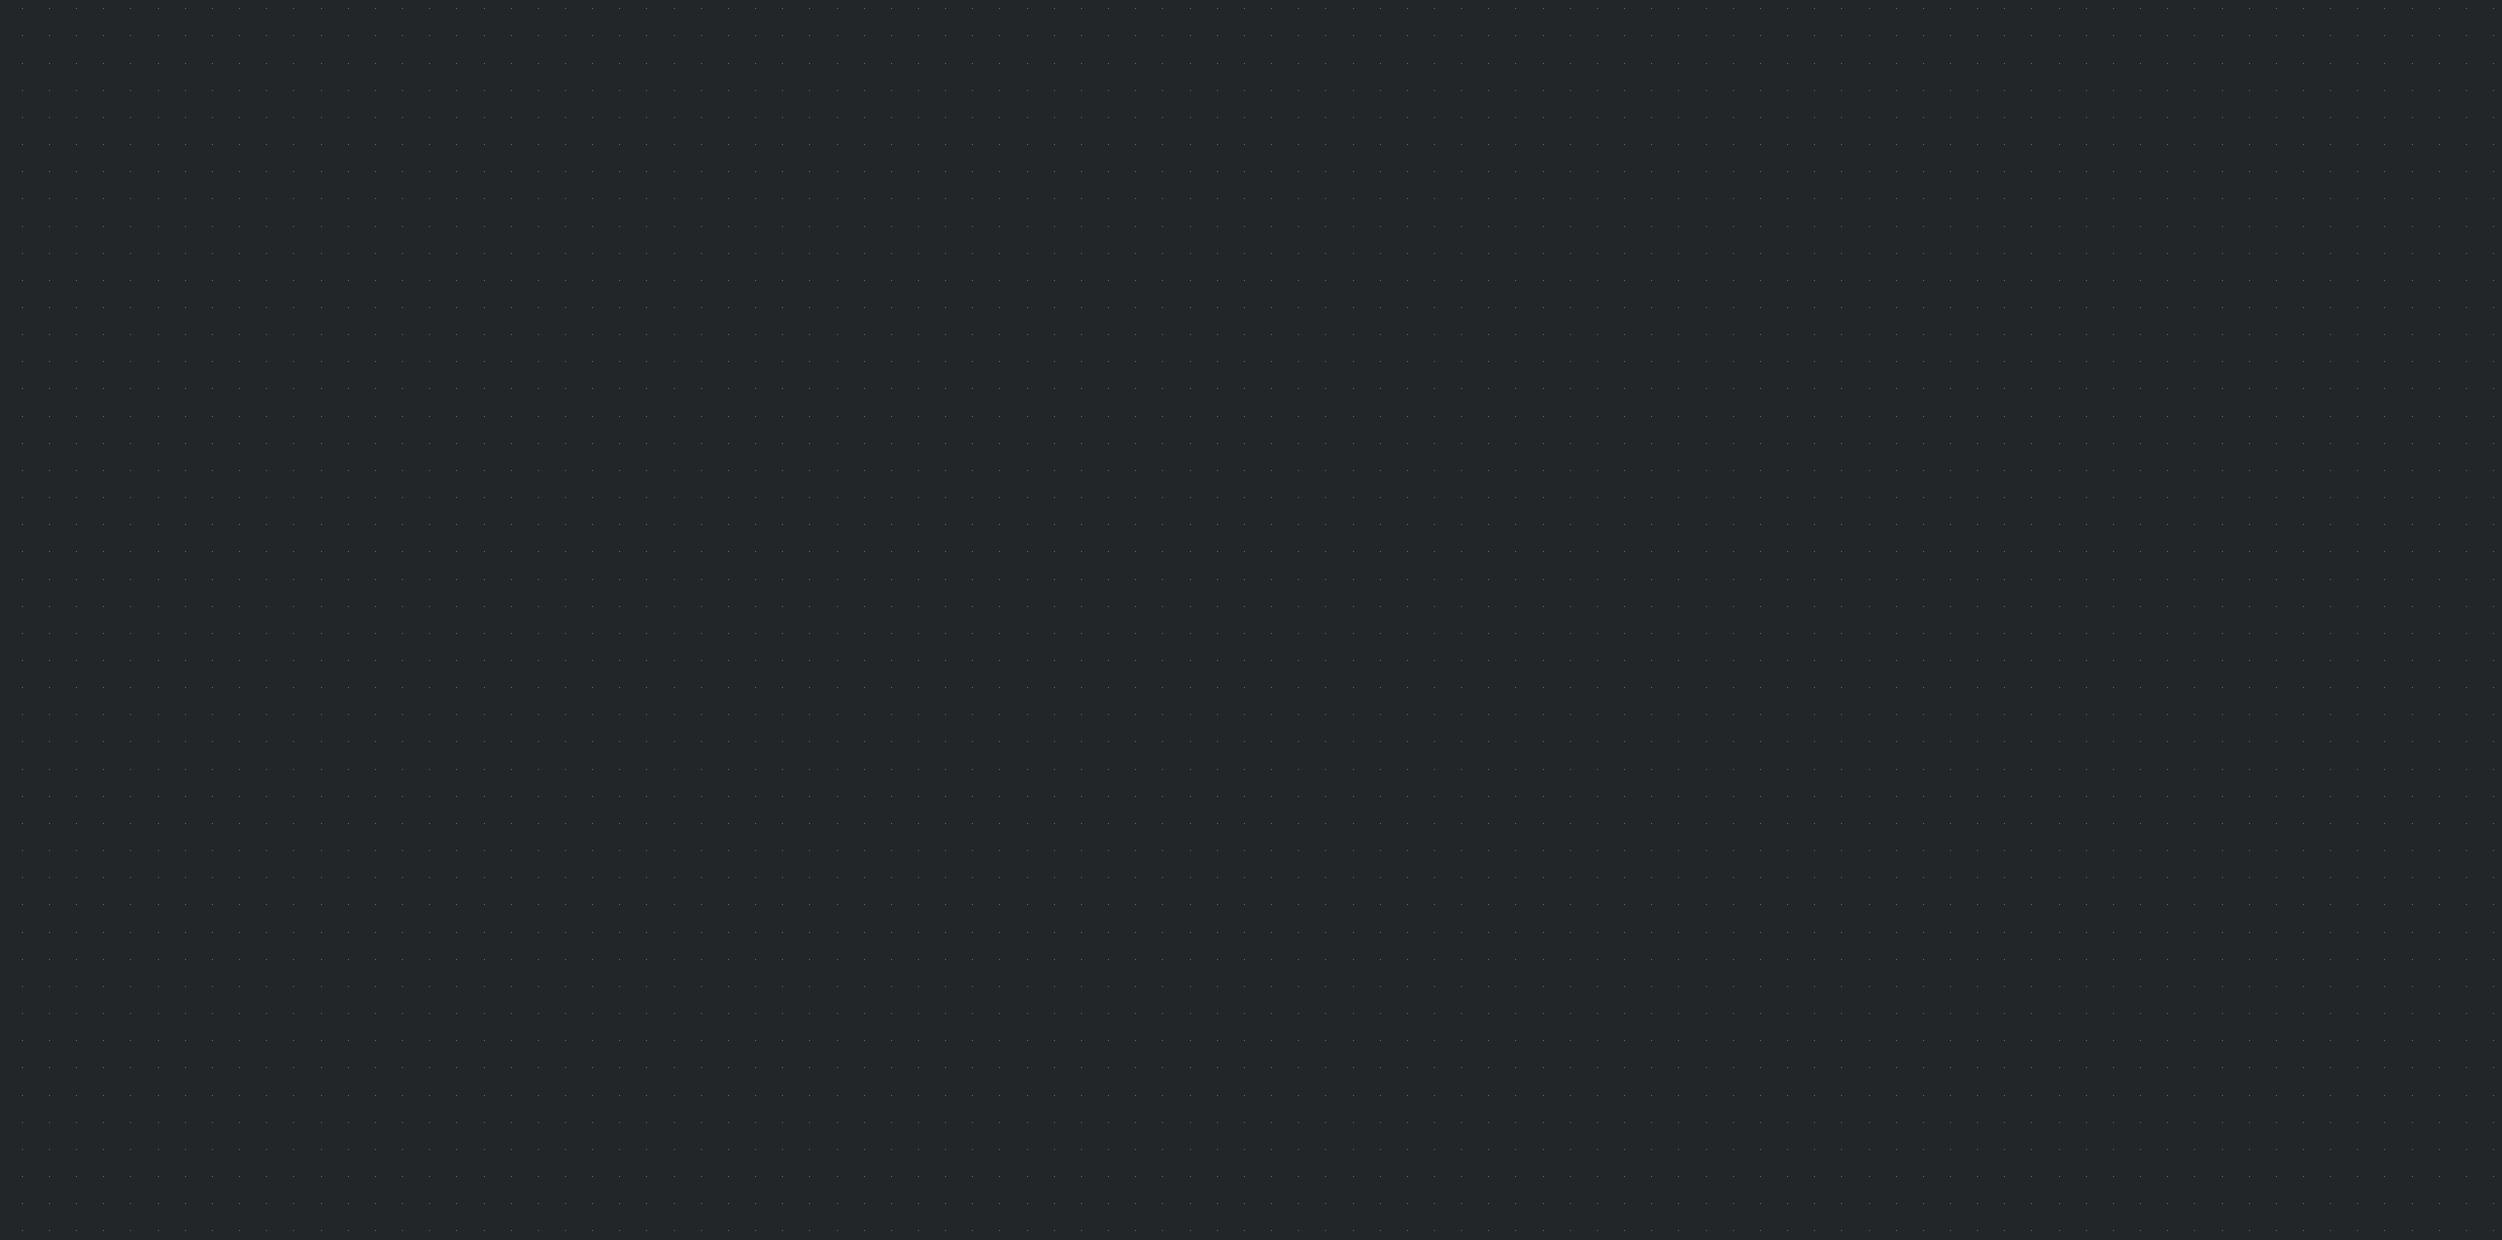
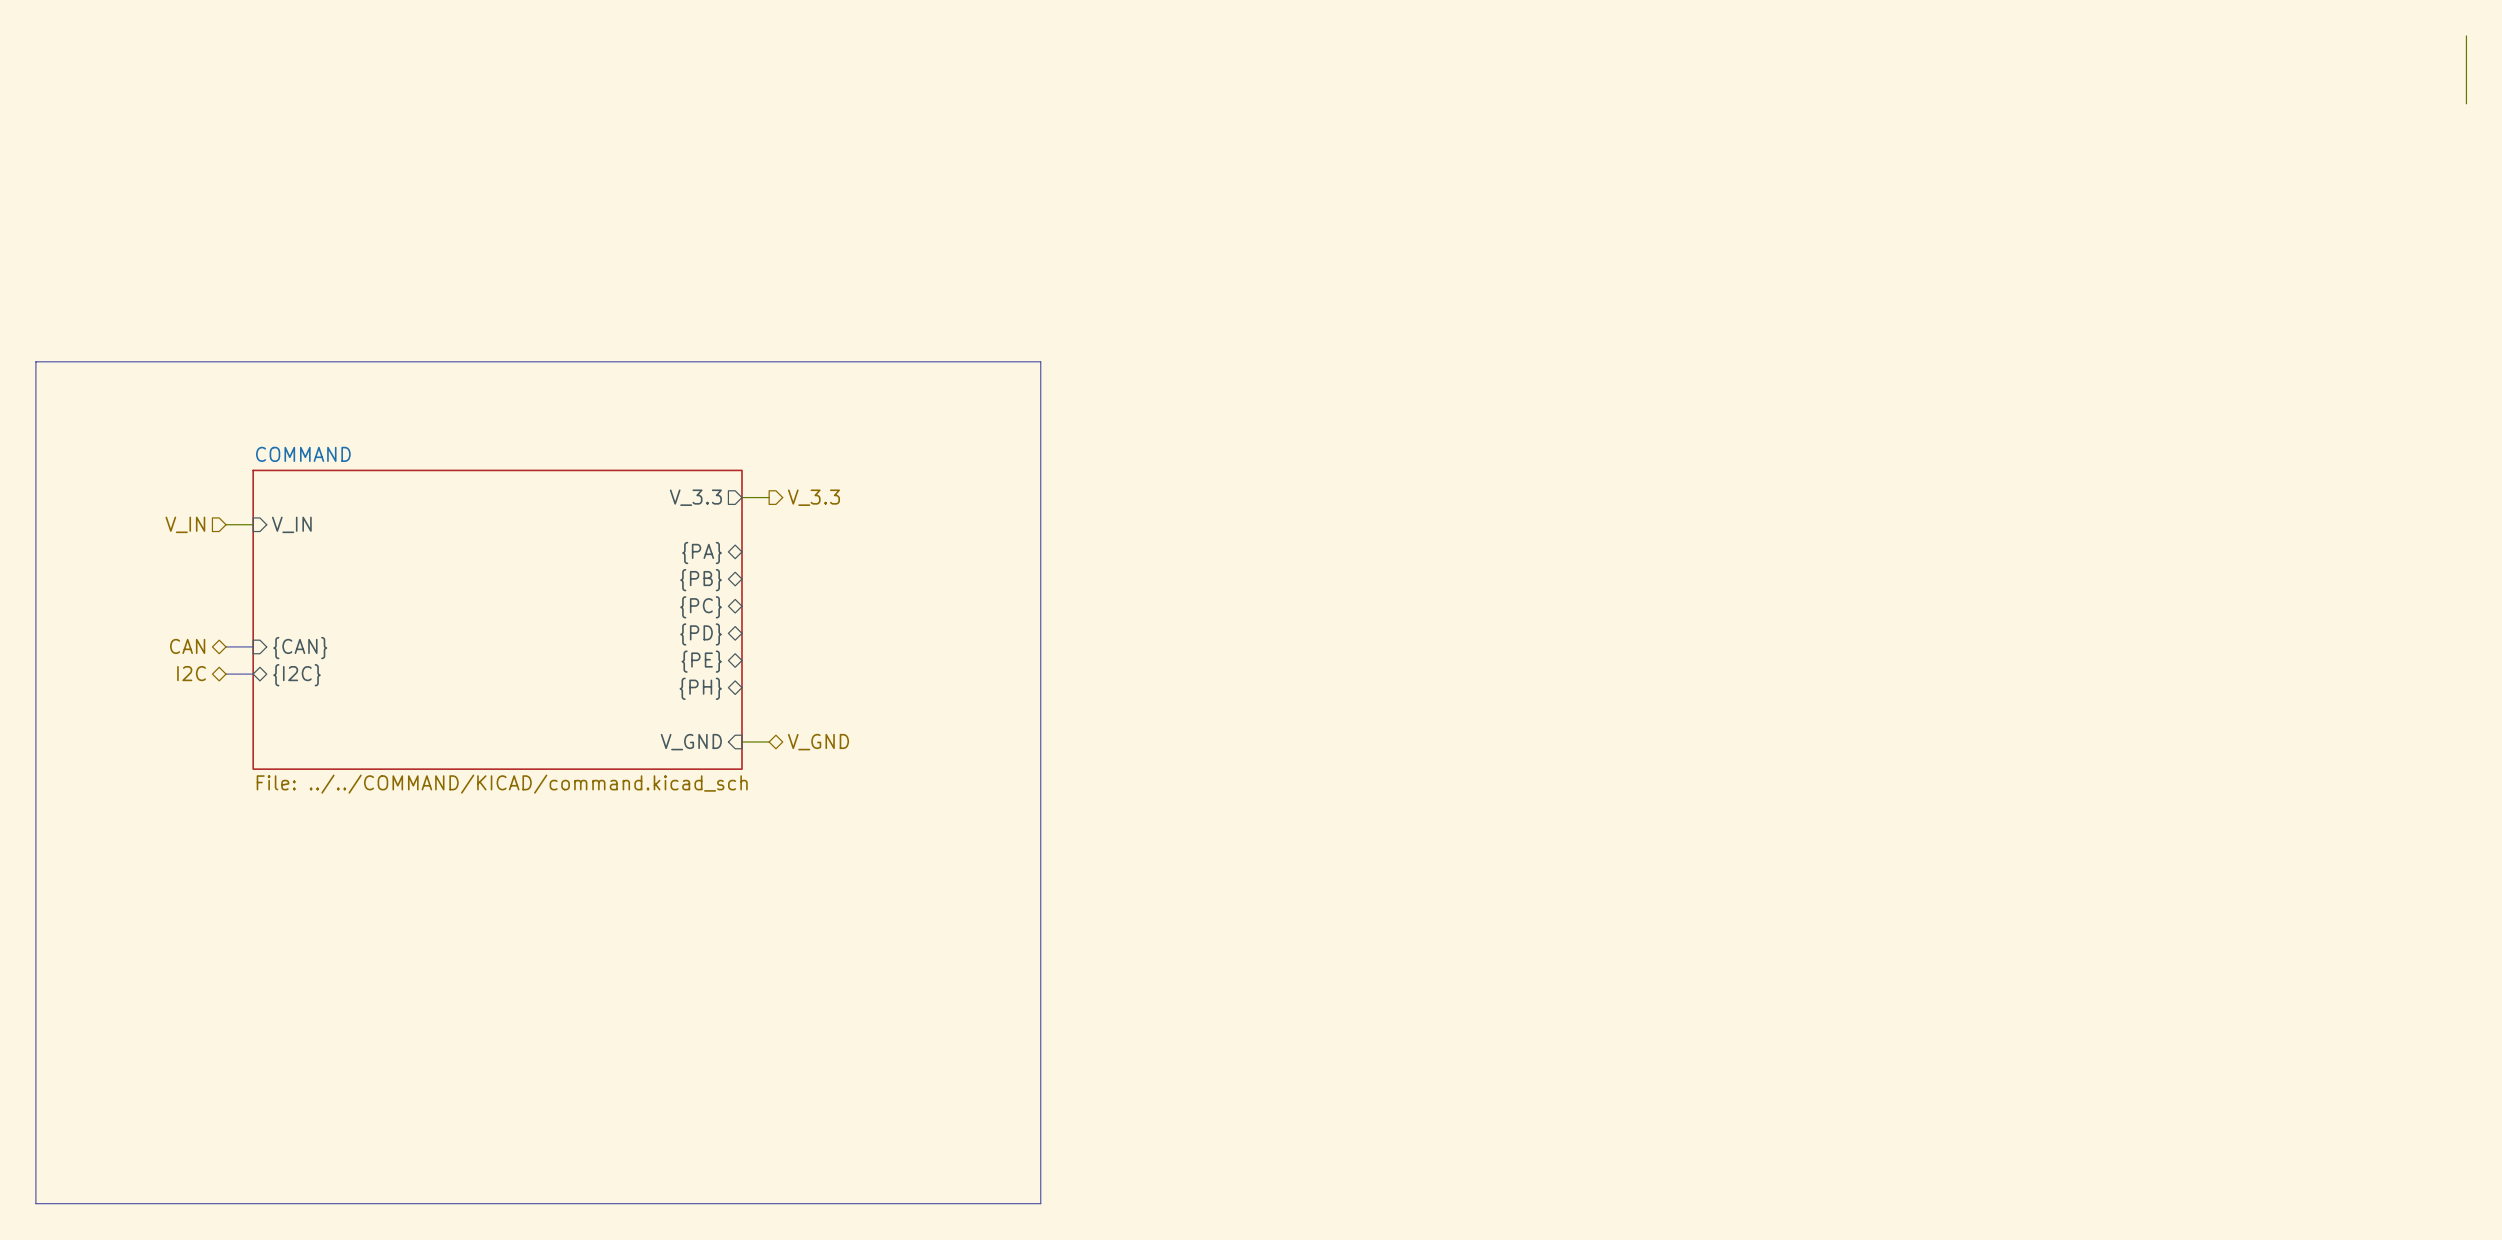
wire: none -> (2466, 35) (2466, 103)
line: none -> (35, 361) (1040, 361) (1040, 1203) (35, 1203) (35, 361)
sheet pin: none -> V_3.3 (695, 497)
wire: none -> (741, 497) (769, 497)
hierarchical label: none -> V_3.3 (813, 497)
hierarchical label: none -> V_IN (185, 524)
wire: none -> (226, 524) (253, 524)
sheet pin: none -> V_IN (291, 524)
sheet pin: none -> {PA} (702, 553)
sheet pin: none -> {PB} (701, 580)
sheet pin: none -> {PC} (701, 607)
sheet COMMAND: none -> File: ../../COMMAND/KICAD/command.kicad_sch (497, 619)
sheet pin: none -> {PD} (701, 634)
hierarchical label: none -> CAN (187, 646)
bus: none -> (226, 646) (253, 646)
sheet pin: none -> {CAN} (300, 648)
sheet pin: none -> {PE} (701, 661)
hierarchical label: none -> I2C (191, 673)
bus: none -> (226, 674) (253, 674)
sheet pin: none -> {I2C} (297, 675)
sheet pin: none -> {PH} (700, 688)
wire: none -> (741, 741) (769, 741)
sheet pin: none -> V_GND (691, 742)
hierarchical label: none -> V_GND (818, 742)

